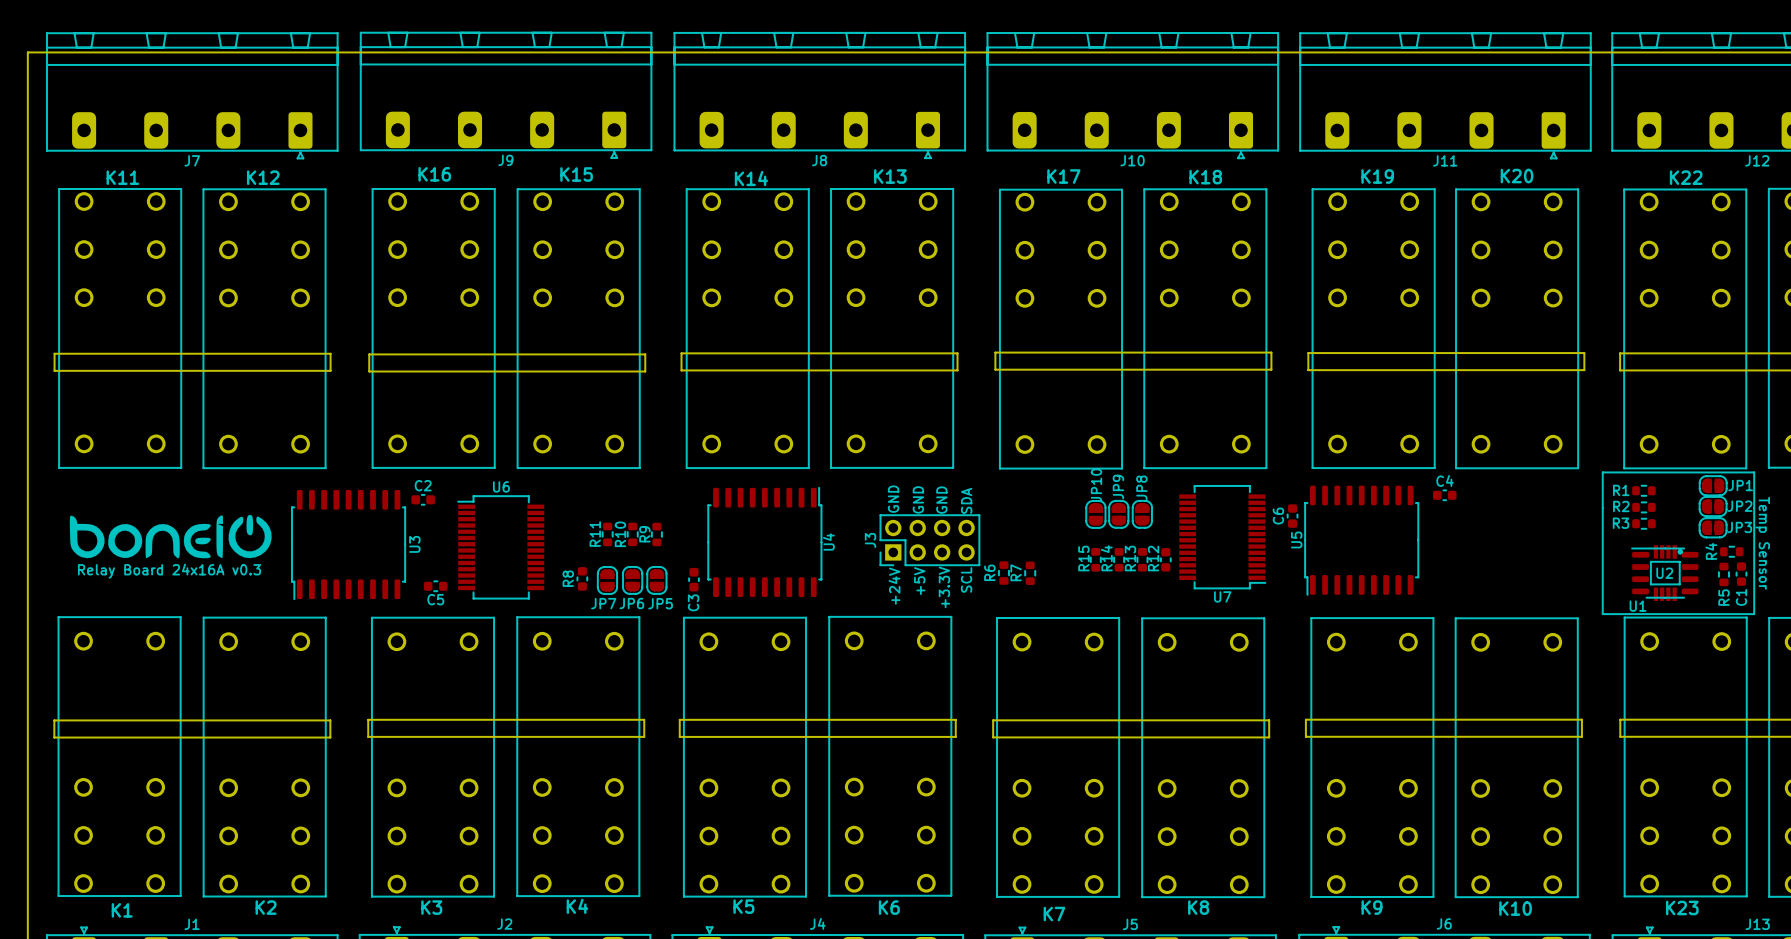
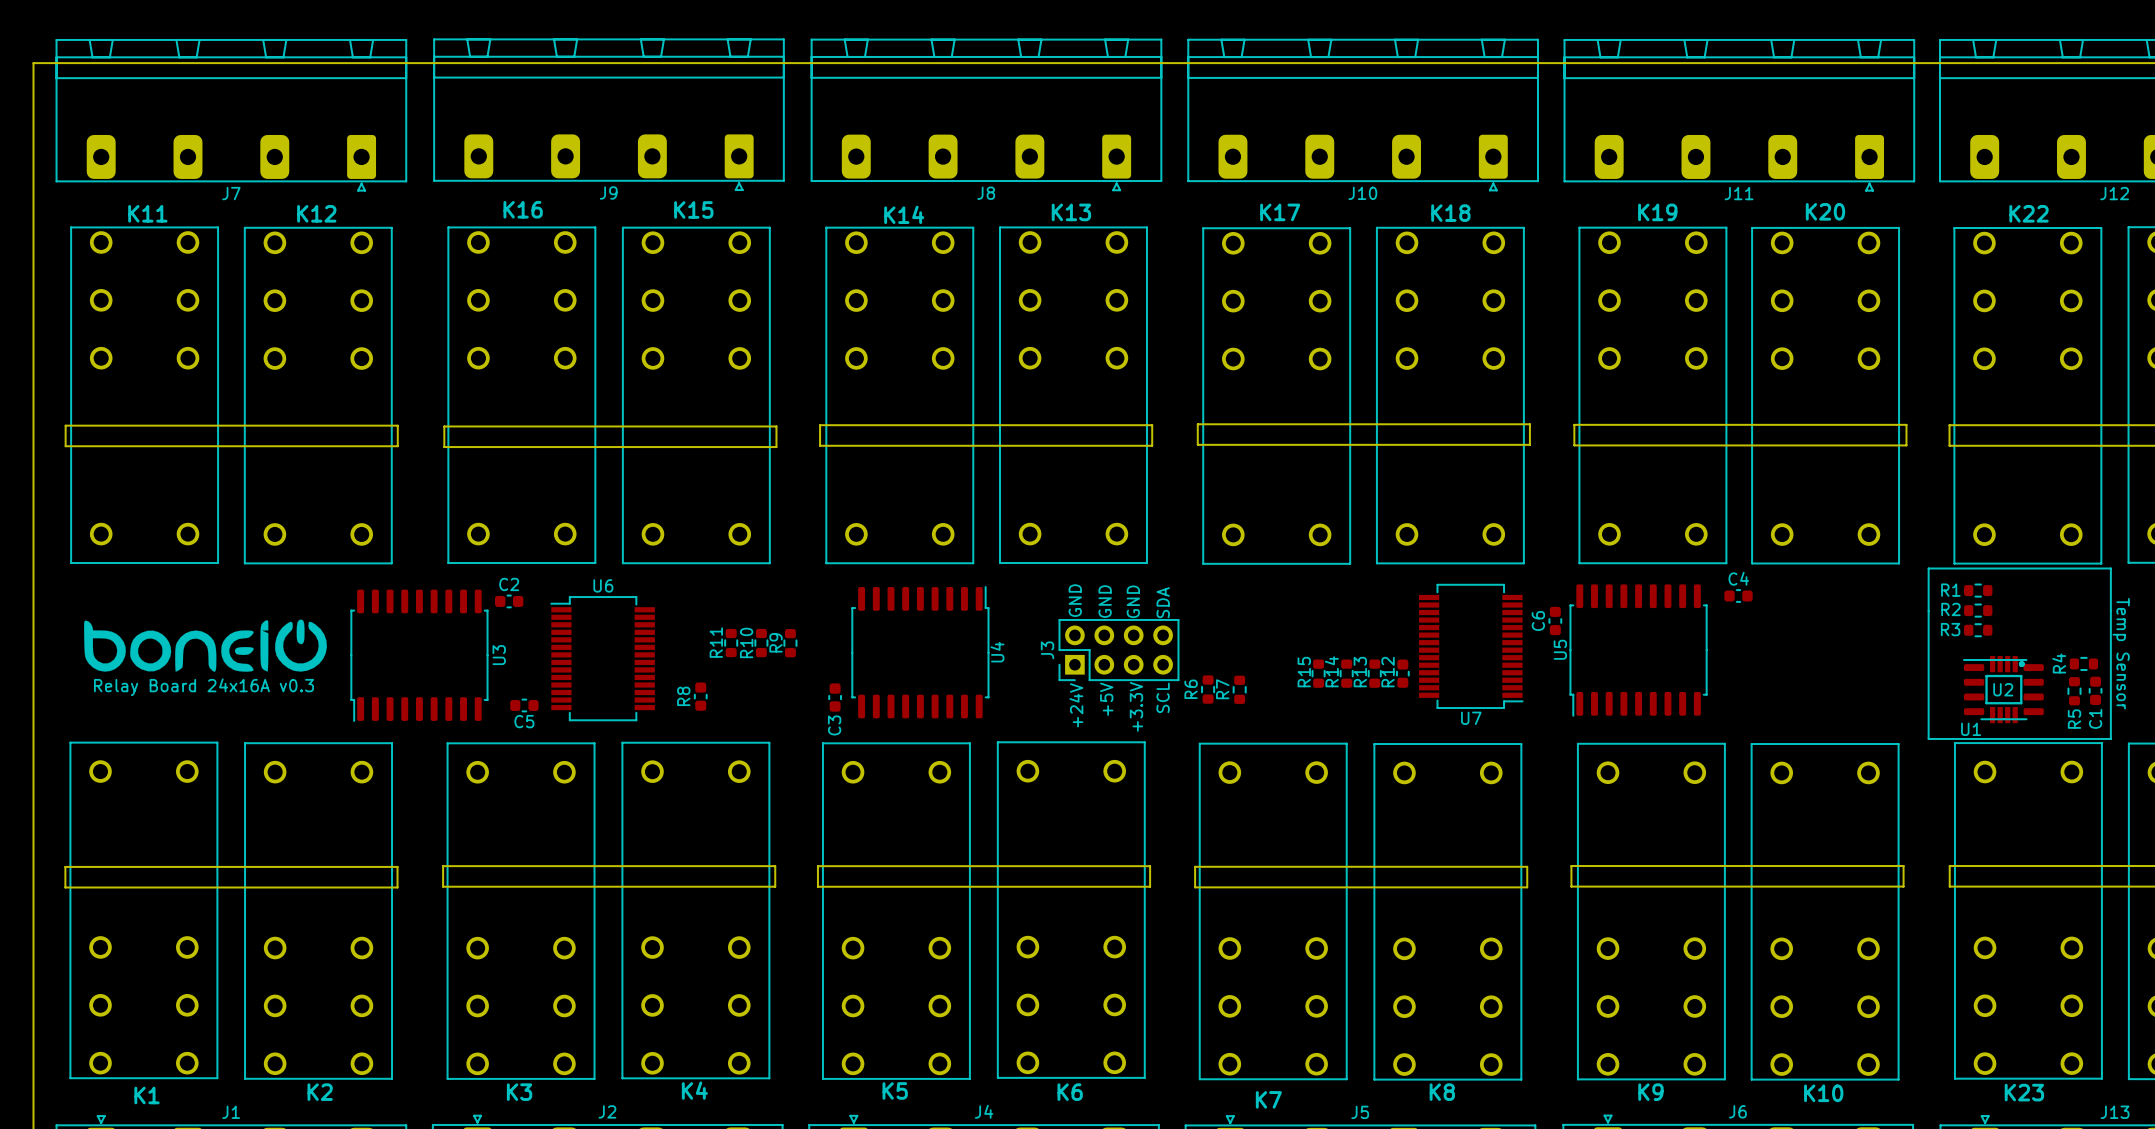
JP1: (1713, 485) -> none
JP2: (1713, 506) -> none
JP10: (1095, 514) -> none
JP9: (1118, 514) -> none
JP8: (1142, 514) -> none
JP3: (1713, 527) -> none
JP7: (607, 580) -> none
JP6: (632, 580) -> none
JP5: (656, 580) -> none

